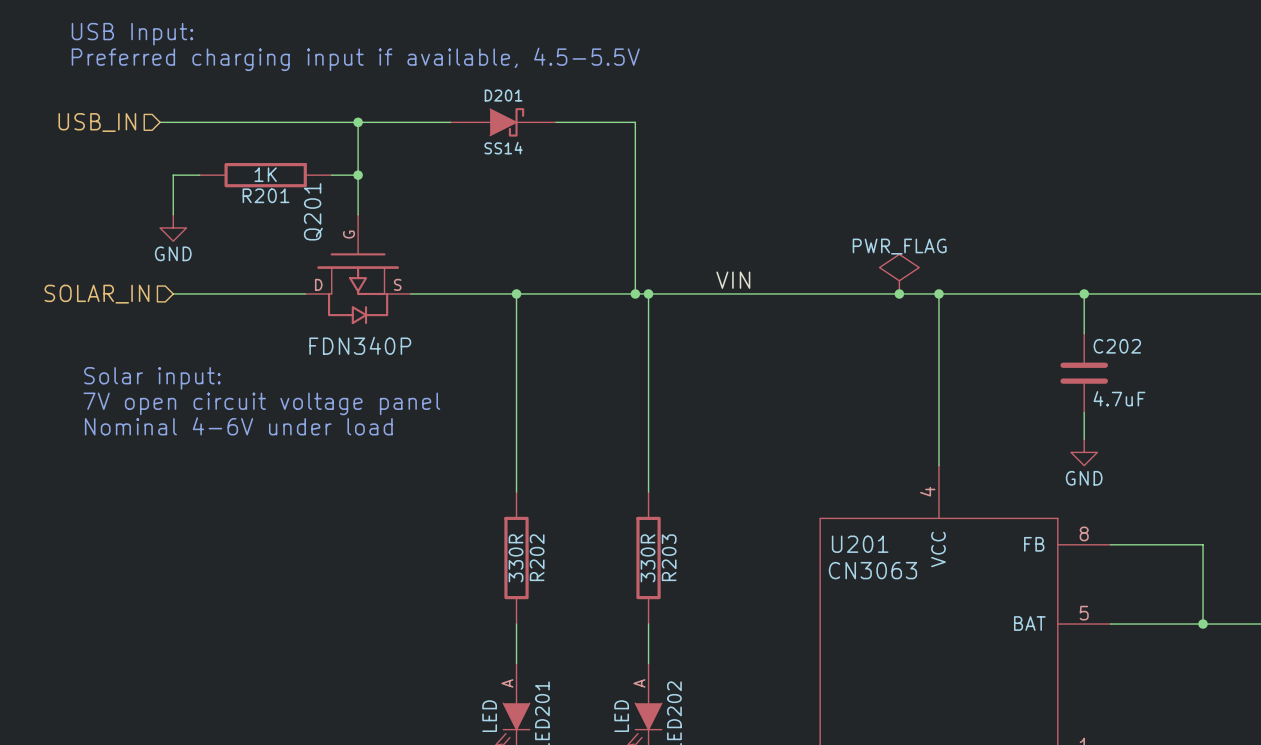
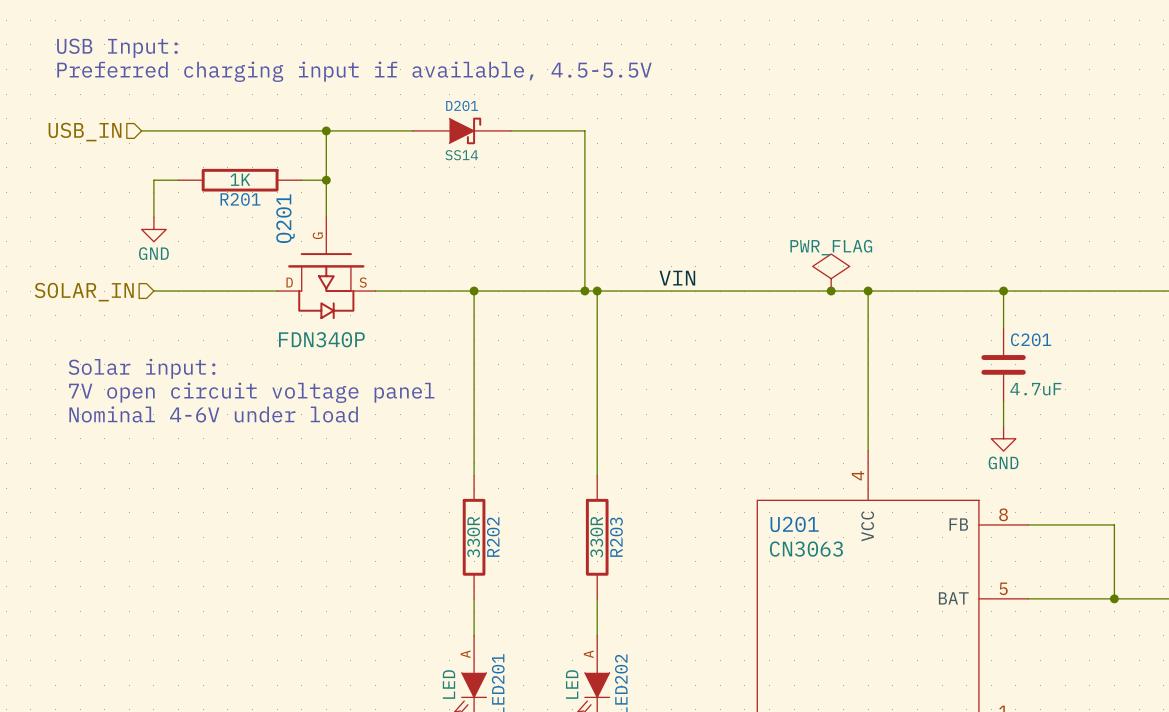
C202 name: C202 (1117, 346) -> C201 (1031, 339)

